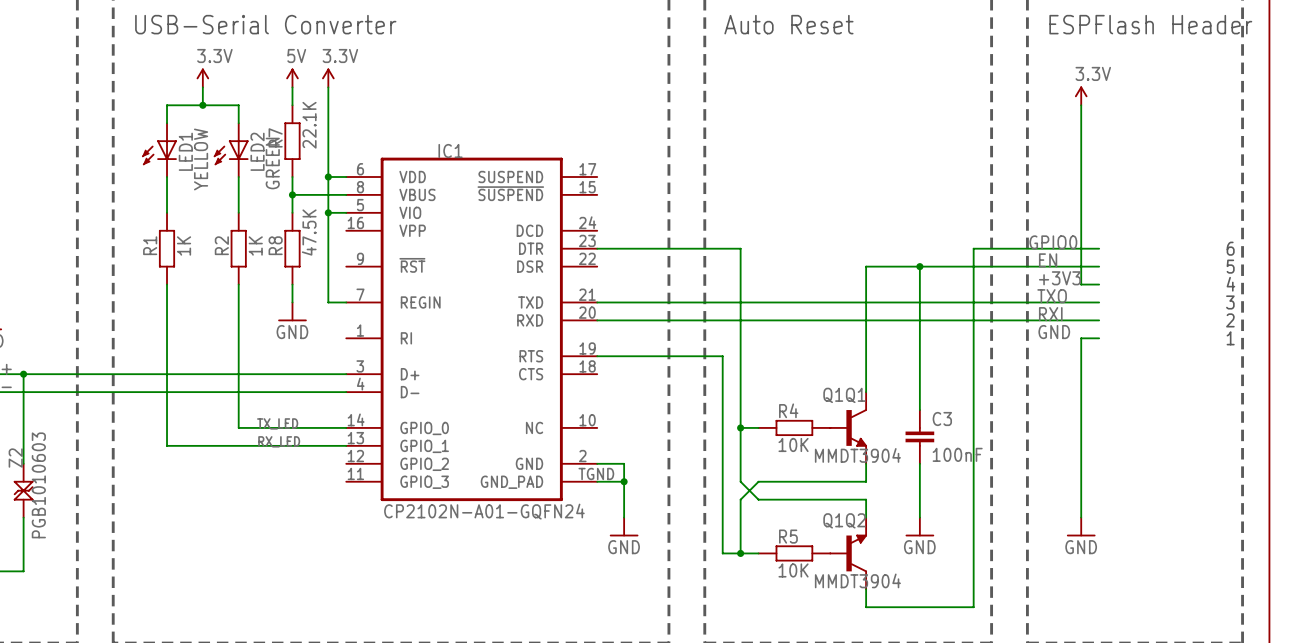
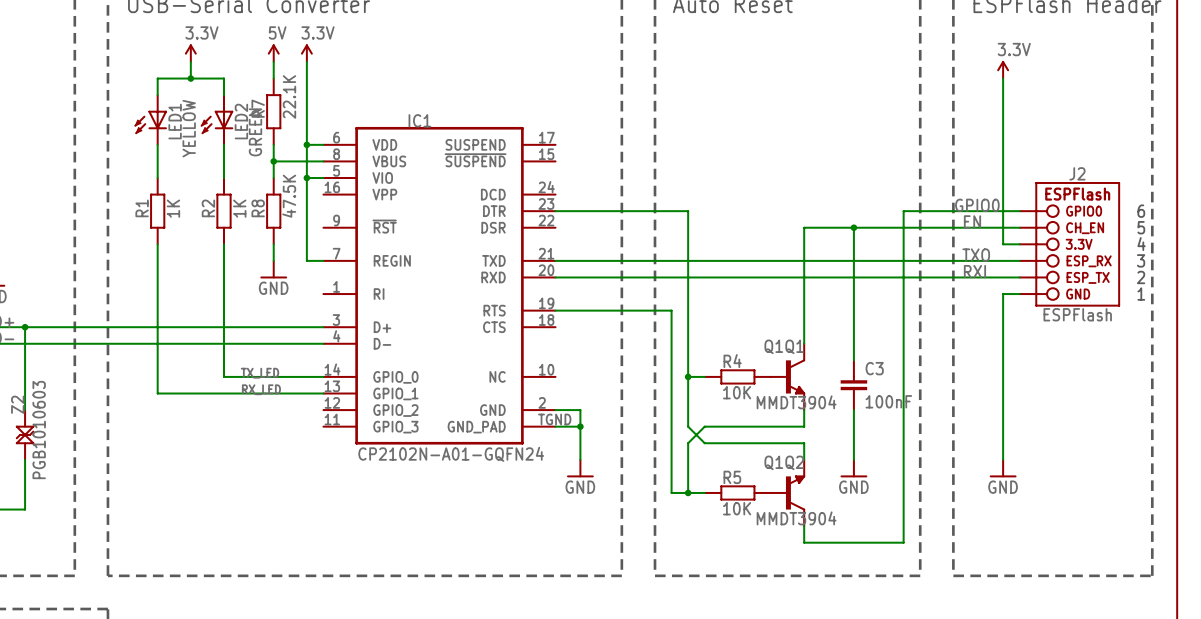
label: +3V3 (1059, 278) -> none
J2: none -> (1069, 244)
label: GND (1054, 332) -> none

